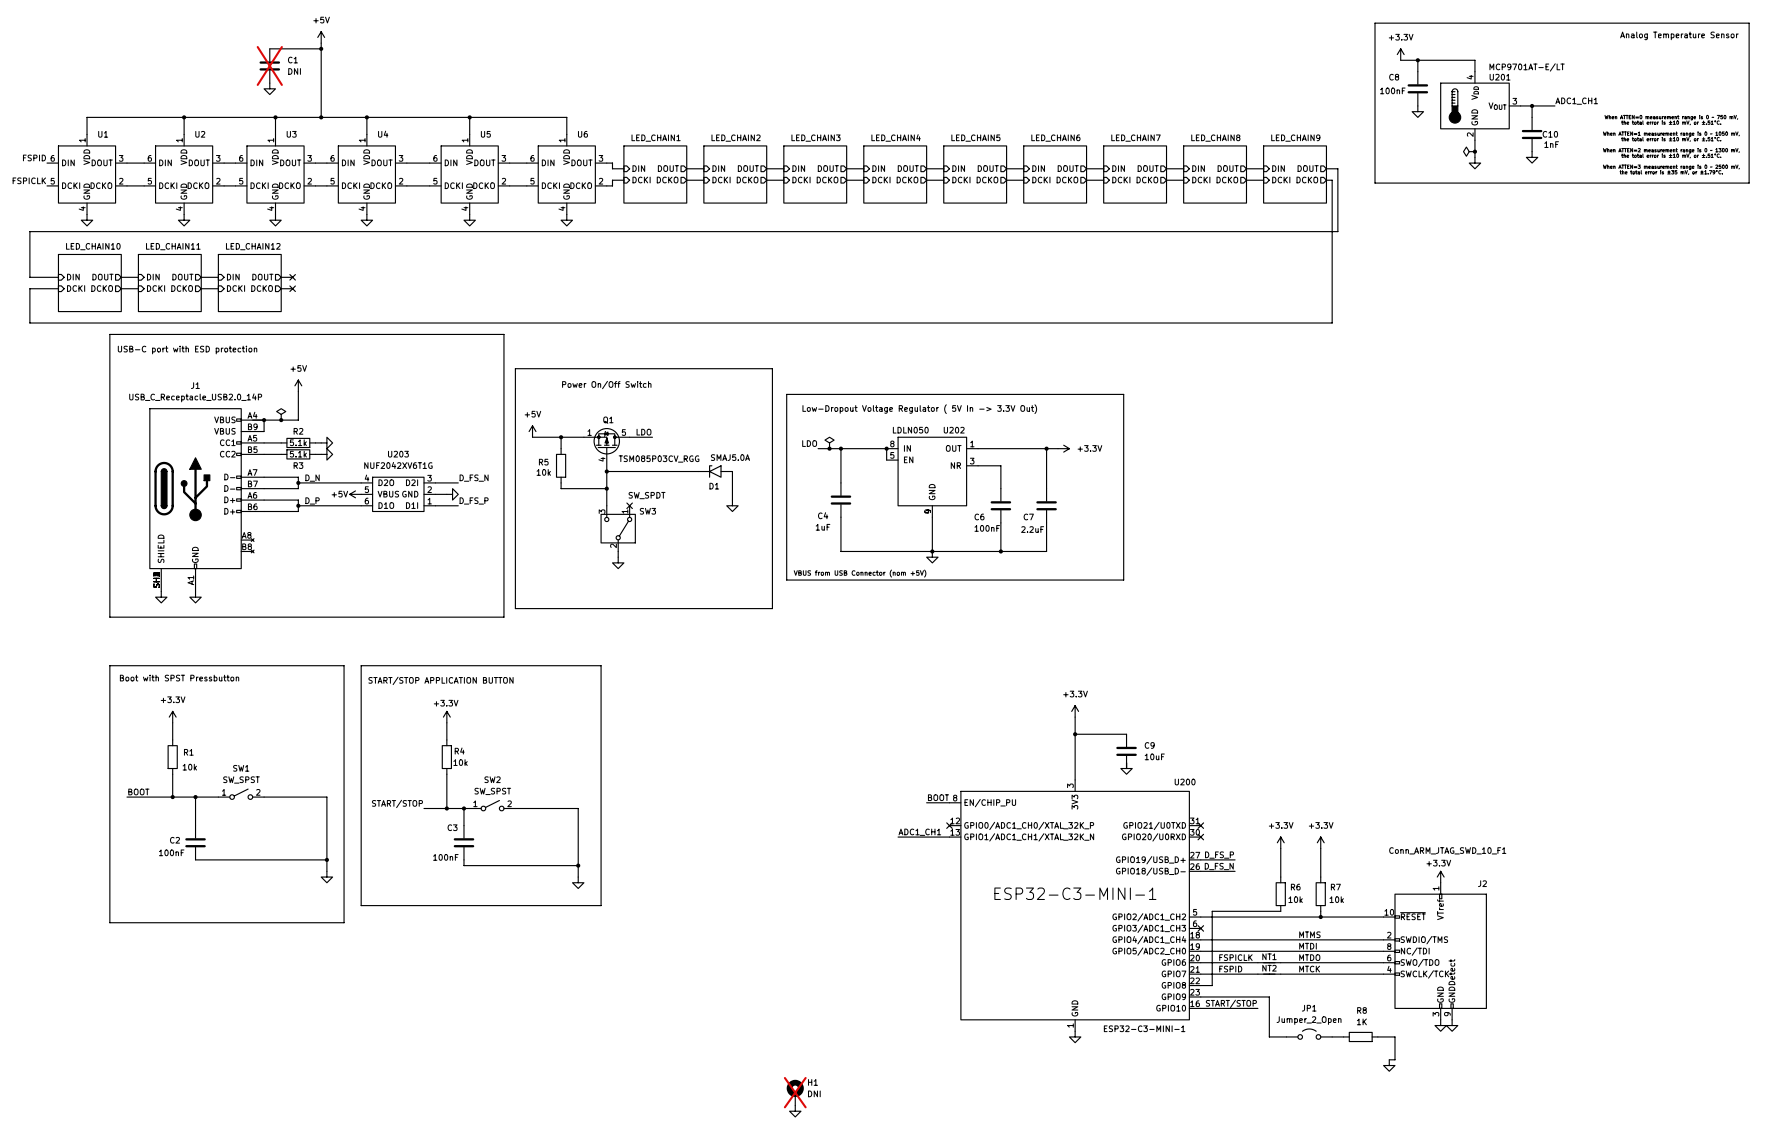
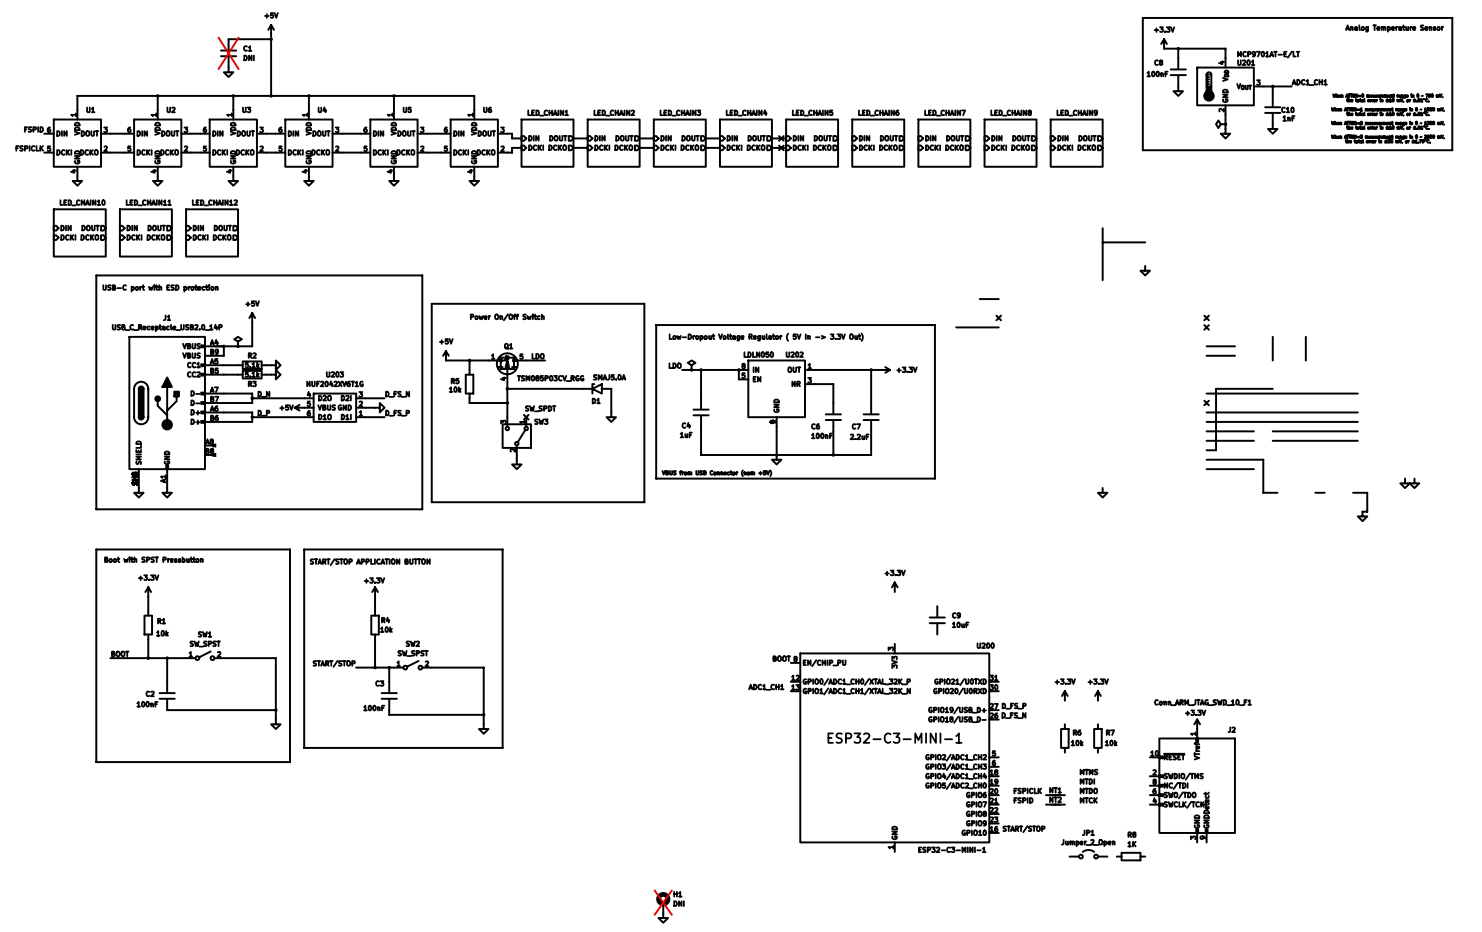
no-connect mark: none -> (781, 138)
wire: (1006, 168) (1023, 168) -> none
wire: (1086, 168) (1103, 168) -> none
wire: (1166, 168) (1183, 168) -> none
wire: (1246, 168) (1263, 168) -> none
wire: (1326, 168) (1337, 168) (1337, 231) (29, 231) (29, 277) (58, 277) -> none
no-connect mark: none -> (781, 147)
wire: (1006, 180) (1023, 180) -> none
wire: (1086, 180) (1103, 180) -> none
wire: (1166, 180) (1183, 180) -> none
wire: (1246, 180) (1263, 180) -> none
wire: (1326, 180) (1332, 180) (1332, 323) (29, 323) (29, 288) (58, 288) -> none
wire: (121, 277) (138, 277) -> none
wire: (201, 277) (218, 277) -> none
wire: (281, 277) (292, 277) -> none
no-connect mark: (292, 277) -> none
wire: none -> (1102, 228) (1102, 280)
wire: (121, 288) (138, 288) -> none
wire: (201, 288) (218, 288) -> none
wire: (281, 288) (292, 288) -> none
no-connect mark: (292, 288) -> none
wire: none -> (1102, 242) (1145, 242)
power symbol: none -> (1145, 270)
wire: none -> (979, 299) (998, 299)
no-connect mark: none -> (998, 317)
no-connect mark: none -> (1206, 317)
wire: none -> (956, 327) (998, 327)
no-connect mark: none -> (1206, 327)
wire: none -> (1272, 336) (1272, 360)
wire: none -> (1305, 336) (1305, 360)
wire: none -> (1206, 346) (1234, 346)
wire: none -> (1206, 355) (1234, 355)
wire: none -> (1272, 388) (1216, 388) (1216, 450) (1206, 450)
wire: none -> (1206, 393) (1357, 393)
no-connect mark: none -> (1206, 403)
wire: none -> (1206, 412) (1357, 412)
wire: none -> (1206, 421) (1357, 421)
wire: none -> (1206, 431) (1253, 431)
wire: none -> (1272, 431) (1357, 431)
wire: none -> (1206, 440) (1253, 440)
wire: none -> (1272, 440) (1357, 440)
wire: none -> (1206, 459) (1263, 459) (1263, 492) (1277, 492)
wire: none -> (1206, 469) (1253, 469)
power symbol: none -> (1405, 483)
power symbol: none -> (1414, 483)
power symbol: none -> (1102, 492)
wire: none -> (1315, 492) (1324, 492)
wire: none -> (1353, 492) (1367, 492) (1367, 511) (1362, 511)
power symbol: none -> (1362, 516)
wire: (1075, 717) (1075, 779) -> none
wire: (1075, 734) (1126, 734) -> none
junction: (1075, 734) -> none
power symbol: (1126, 768) -> none
wire: (926, 802) (949, 802) -> none
no-connect mark: (949, 825) -> none
no-connect mark: (1200, 825) -> none
wire: (898, 837) (949, 837) -> none
no-connect mark: (1200, 837) -> none
wire: (1280, 848) (1280, 877) -> none
wire: (1320, 848) (1320, 877) -> none
wire: (1200, 859) (1235, 859) -> none
wire: (1200, 871) (1235, 871) -> none
wire: (1280, 911) (1212, 911) (1212, 985) (1200, 985) -> none
wire: (1320, 911) (1320, 917) -> none
wire: (1200, 917) (1383, 917) -> none
junction: (1320, 917) -> none
no-connect mark: (1200, 928) -> none
wire: (1200, 939) (1383, 939) -> none
wire: (1200, 951) (1383, 951) -> none
wire: (1200, 962) (1257, 962) -> none
wire: (1280, 962) (1383, 962) -> none
wire: (1200, 974) (1257, 974) -> none
wire: (1280, 974) (1383, 974) -> none
wire: (1200, 996) (1269, 996) (1269, 1036) (1286, 1036) -> none
wire: (1200, 1008) (1257, 1008) -> none
power symbol: (1440, 1025) -> none
power symbol: (1452, 1025) -> none
power symbol: (1075, 1036) -> none
wire: (1332, 1036) (1343, 1036) -> none
wire: (1377, 1036) (1394, 1036) (1394, 1059) (1389, 1059) -> none
power symbol: (1389, 1065) -> none

